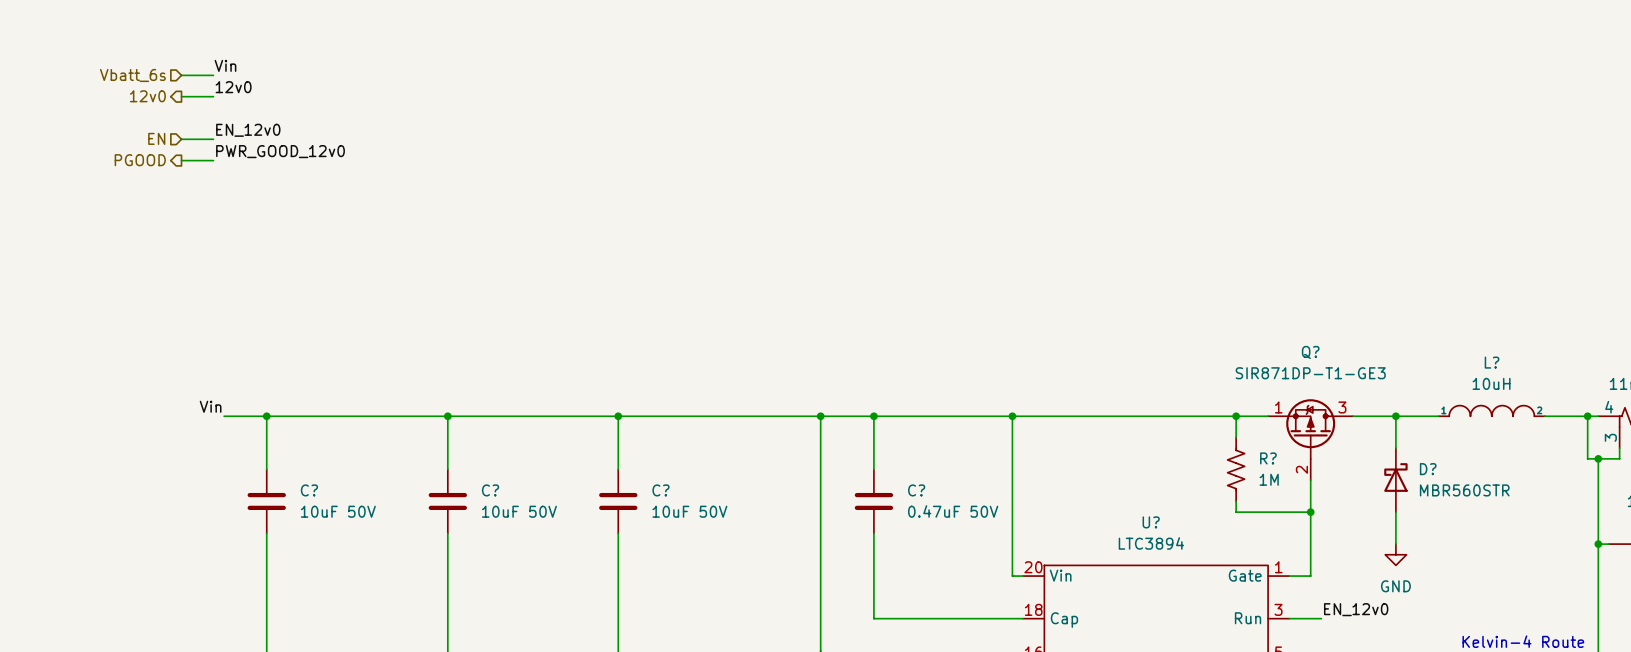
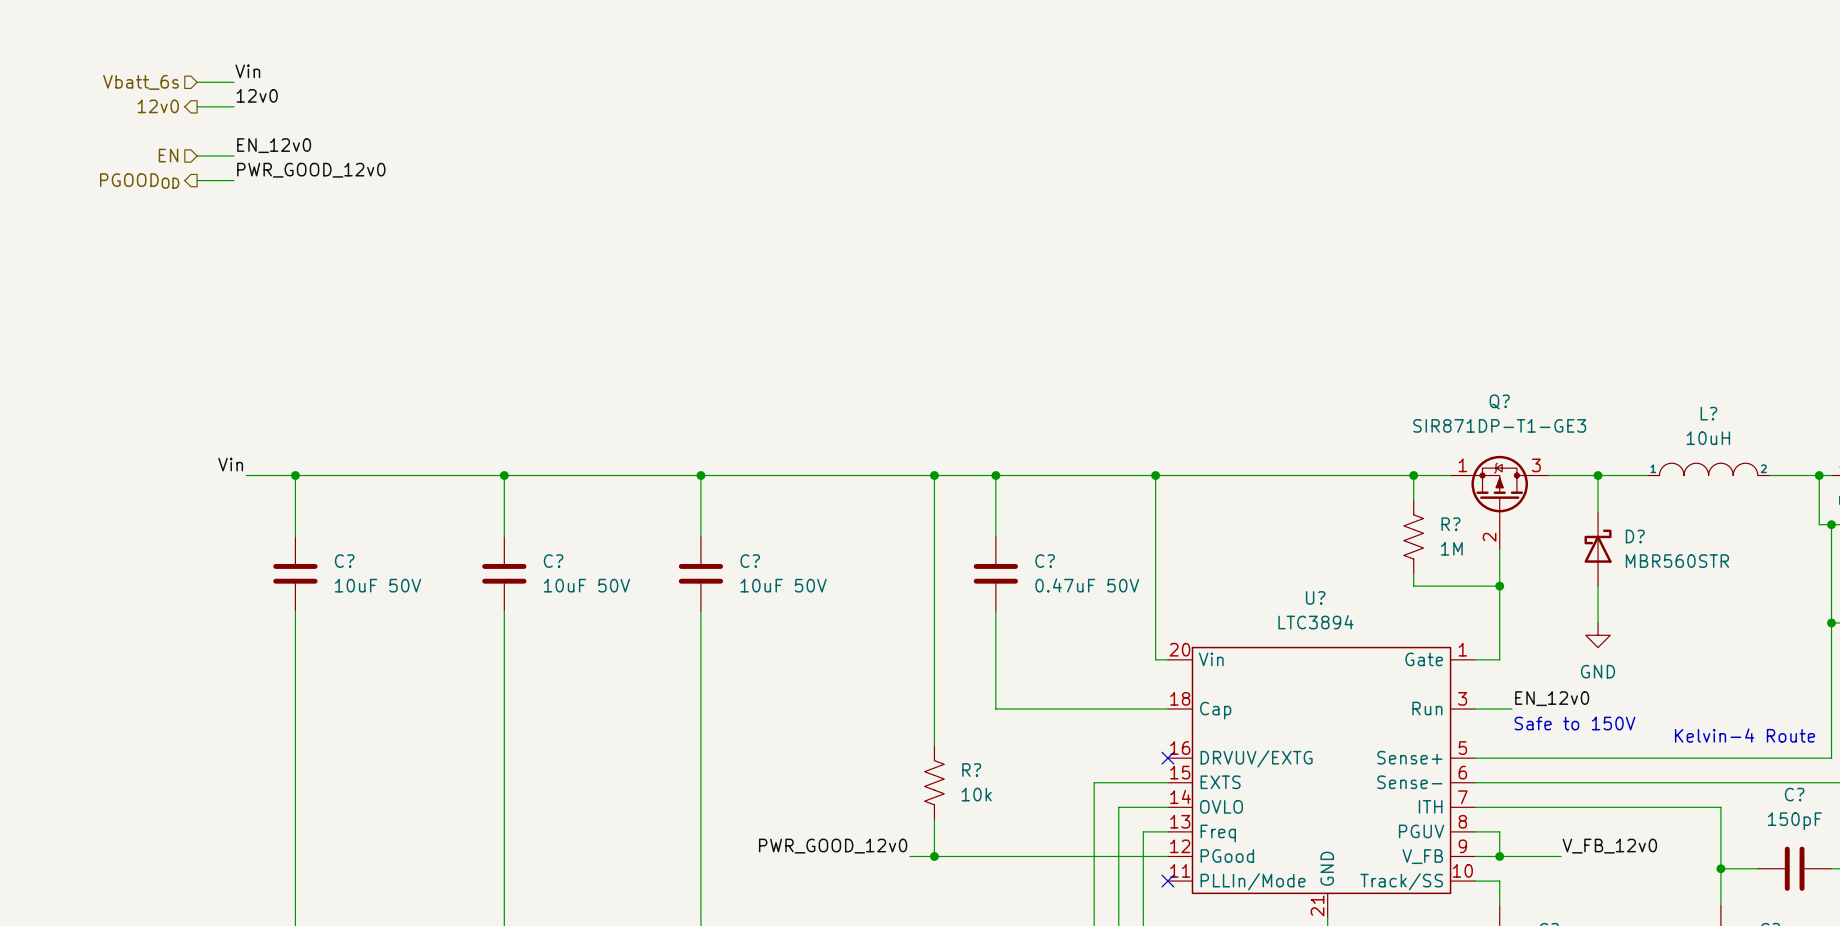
hierarchical label: PGOOD (140, 160) -> PGOODOD (139, 181)
text: none -> Safe to 150V (1575, 723)

